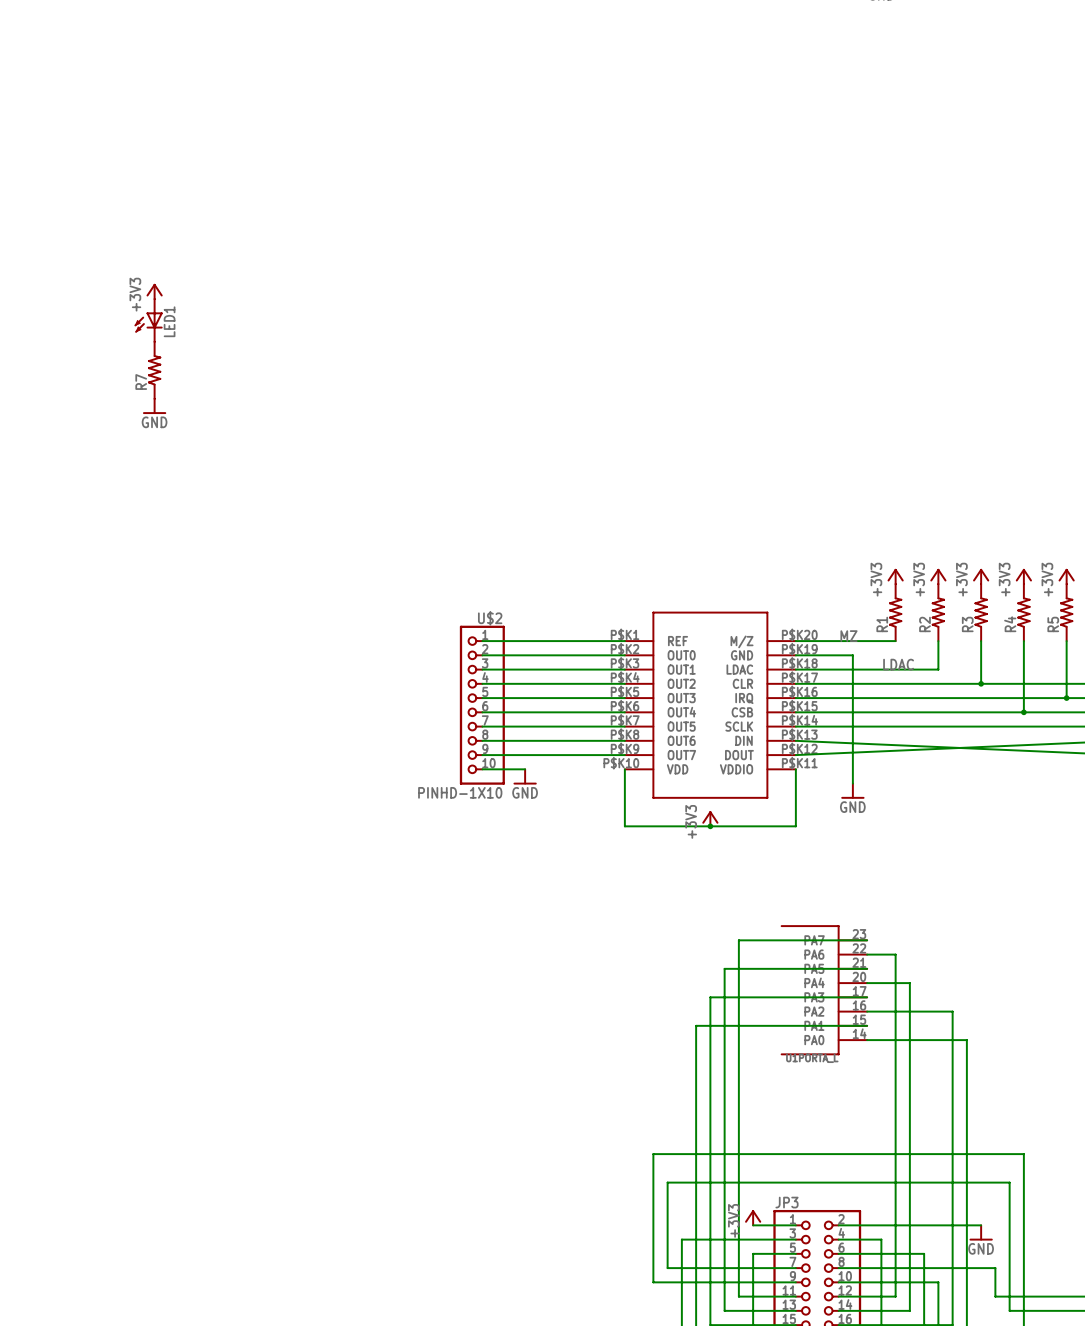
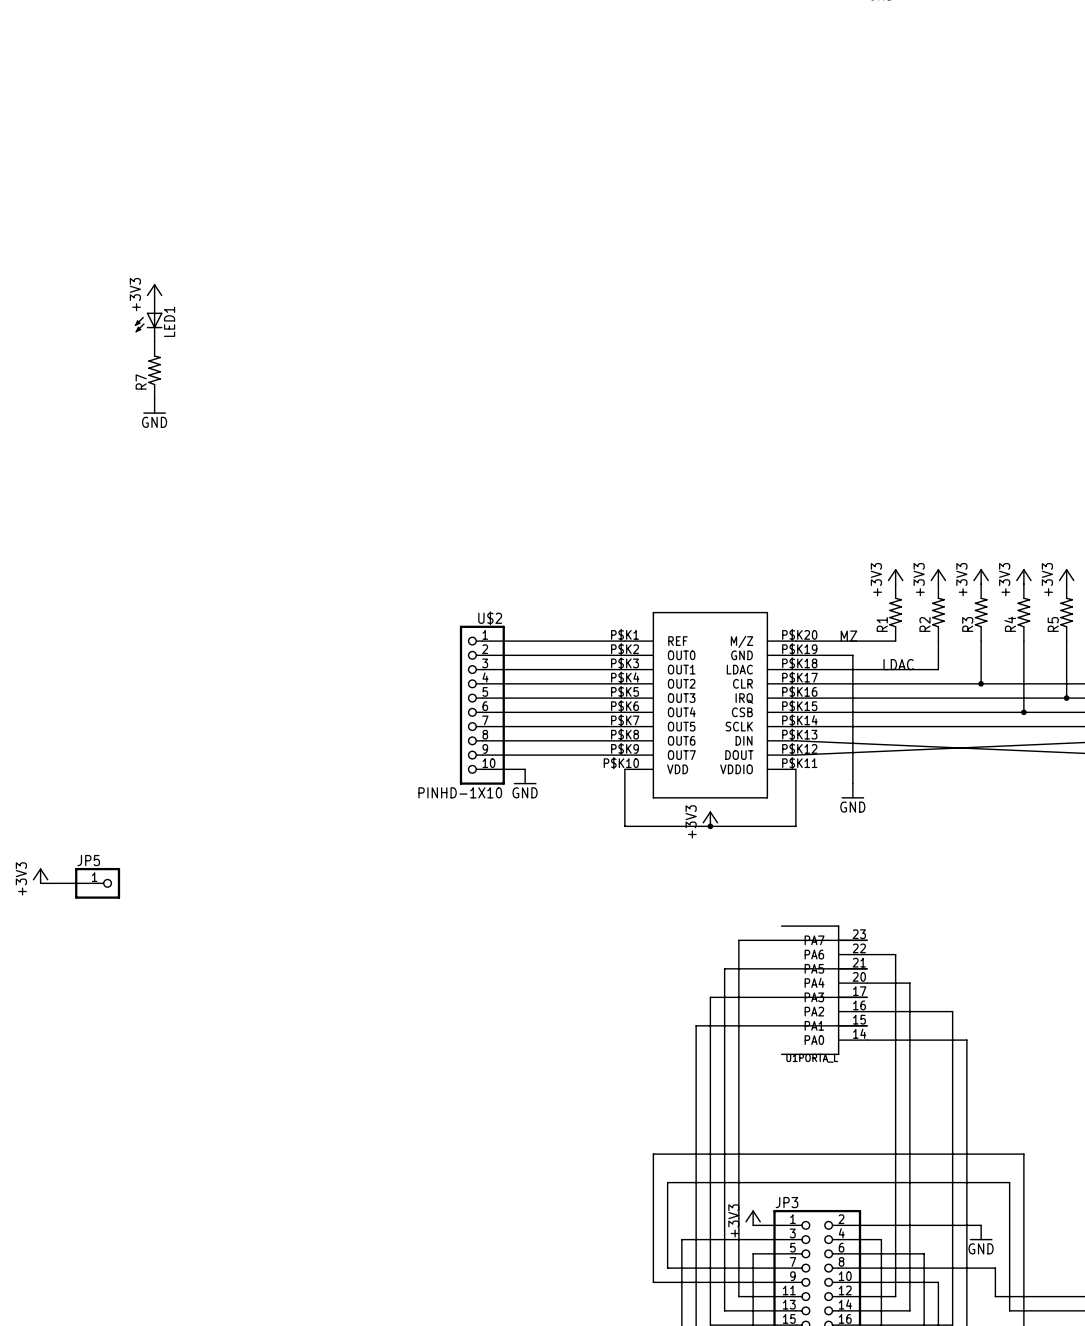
power symbol: none -> +3V3 (40, 875)
wire: none -> (40, 883) (97, 883)
JP5: none -> (97, 883)

